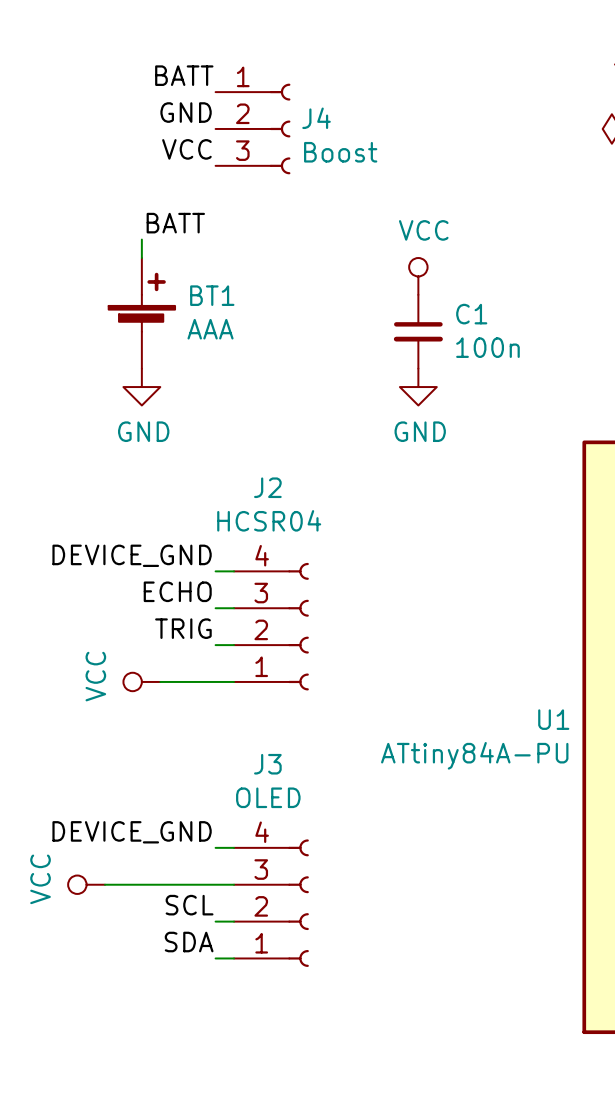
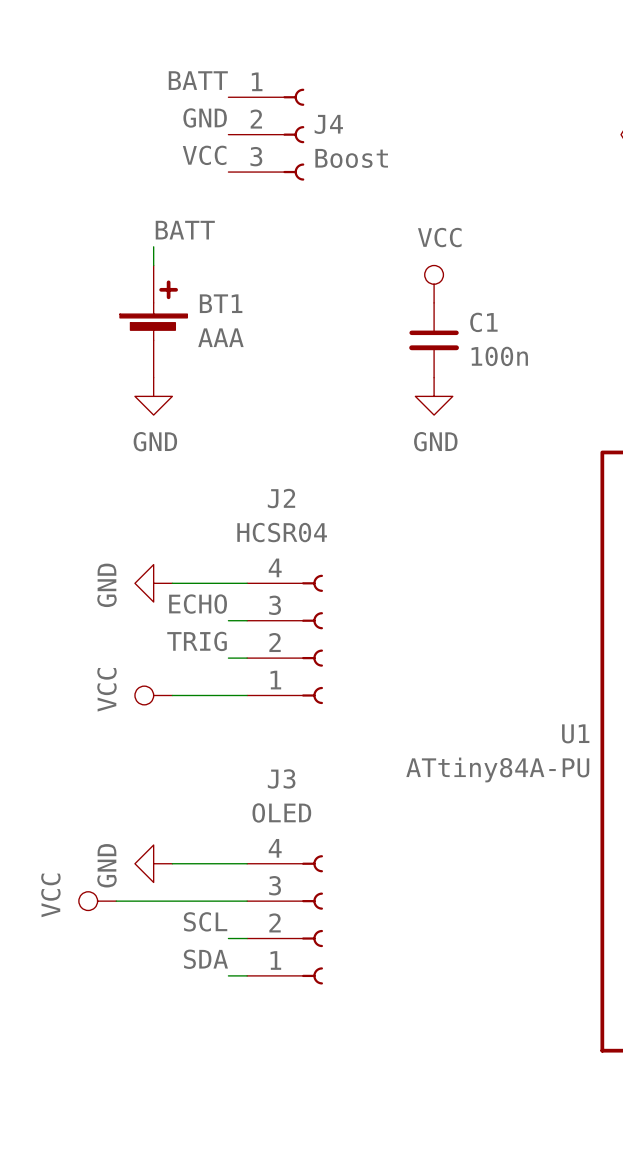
label: DEVICE_GND (132, 555) -> none
power symbol: none -> GND (153, 583)
wire: none -> (172, 583) (228, 583)
label: DEVICE_GND (132, 832) -> none
power symbol: none -> GND (153, 863)
wire: none -> (172, 863) (228, 863)

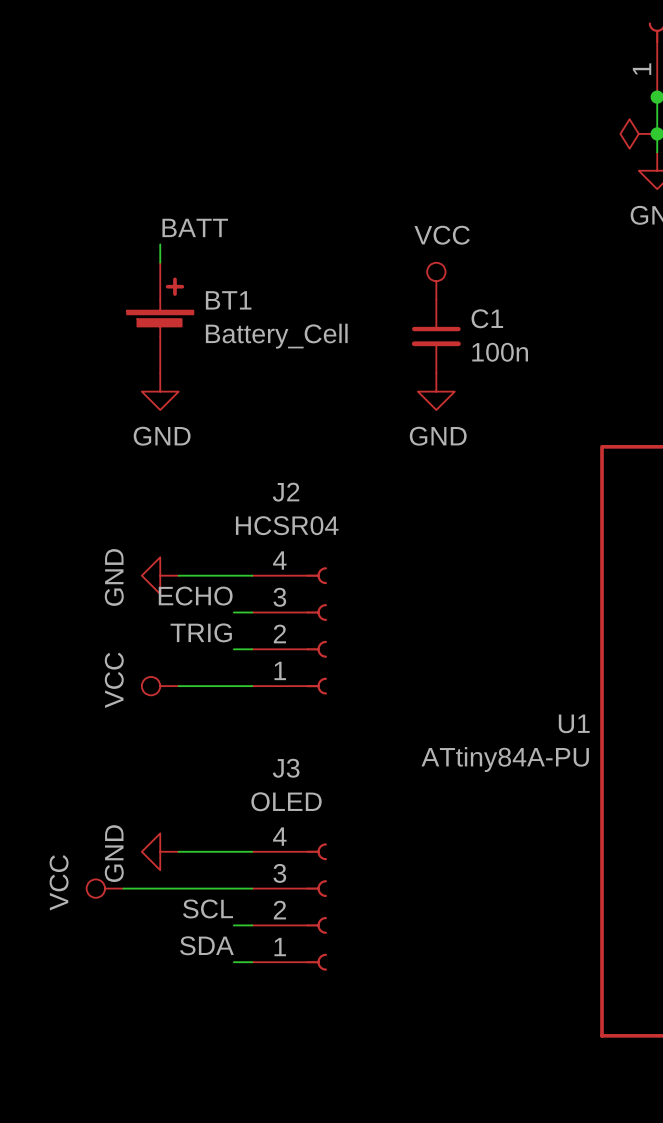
label: BATT (198, 80) -> none
label: GND (205, 117) -> none
J4: Boost (266, 134) -> none
label: VCC (204, 155) -> none
BT1 value: AAA (220, 337) -> Battery_Cell (276, 336)

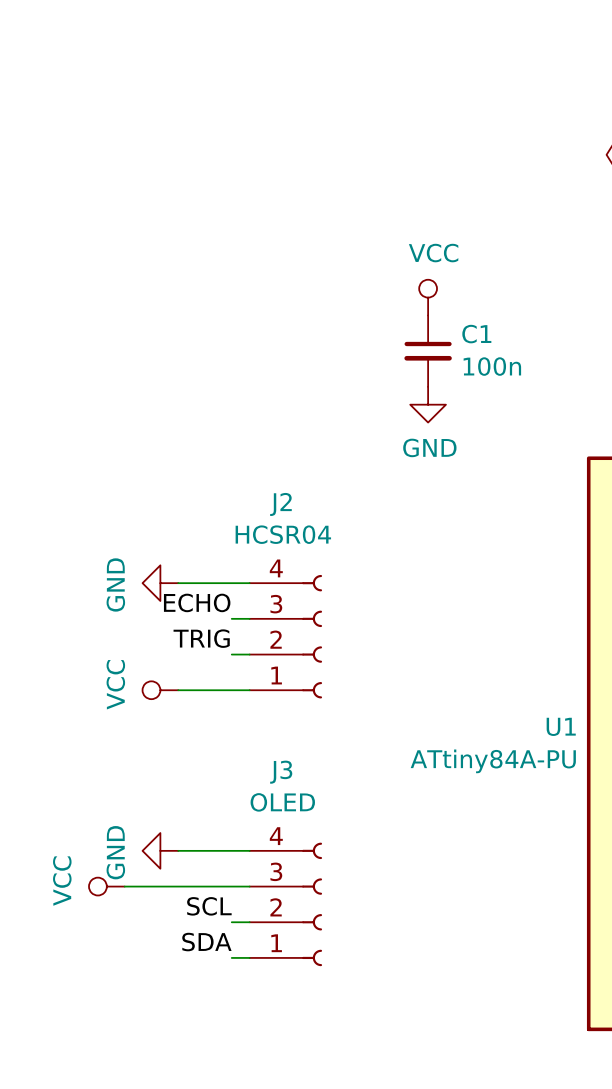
label: BATT (195, 227) -> none
wire: (160, 244) (160, 262) -> none
BT1: Battery_Cell (160, 317) -> none
power symbol: GND (160, 391) -> none

